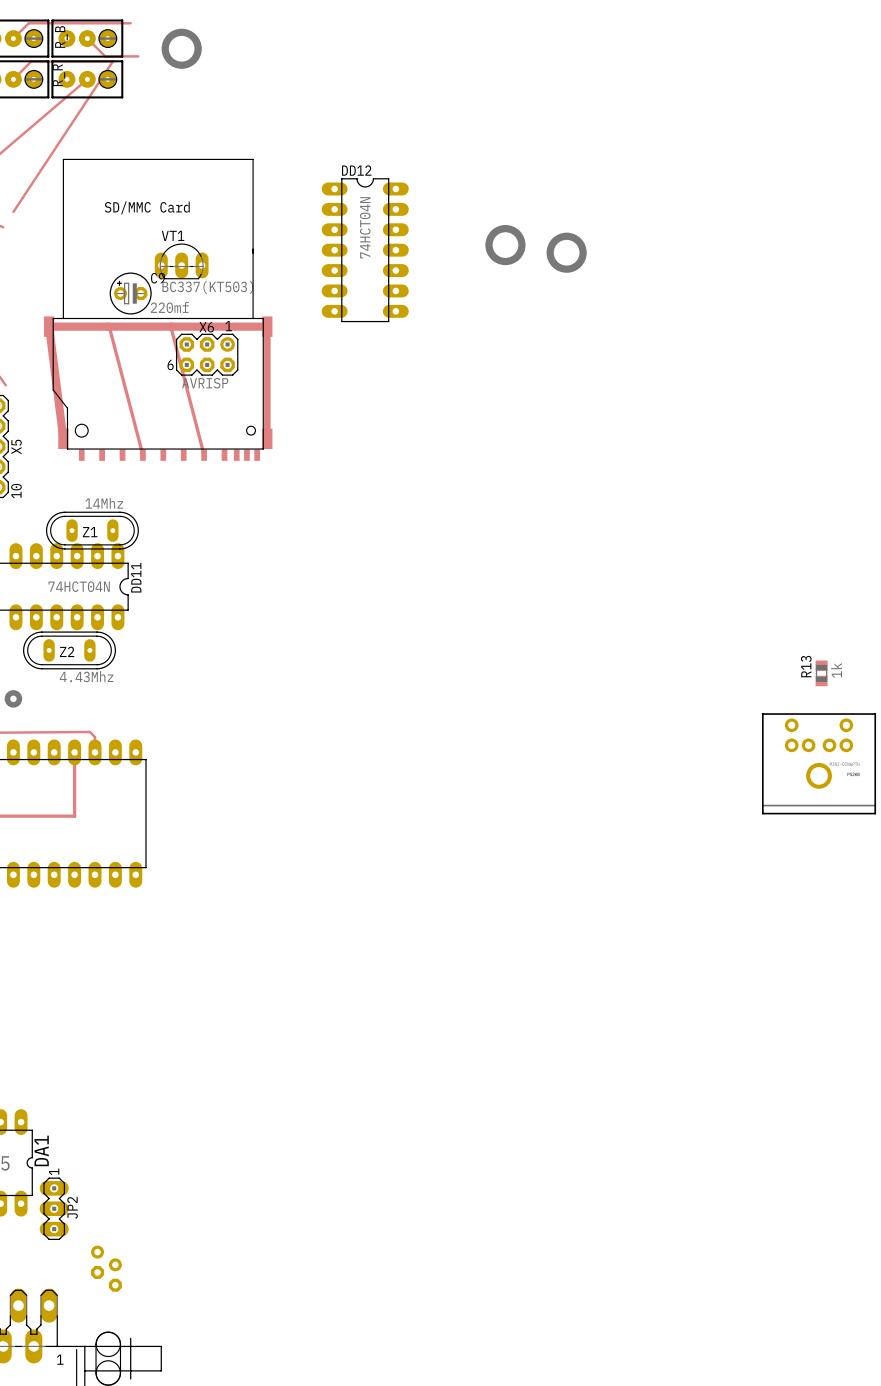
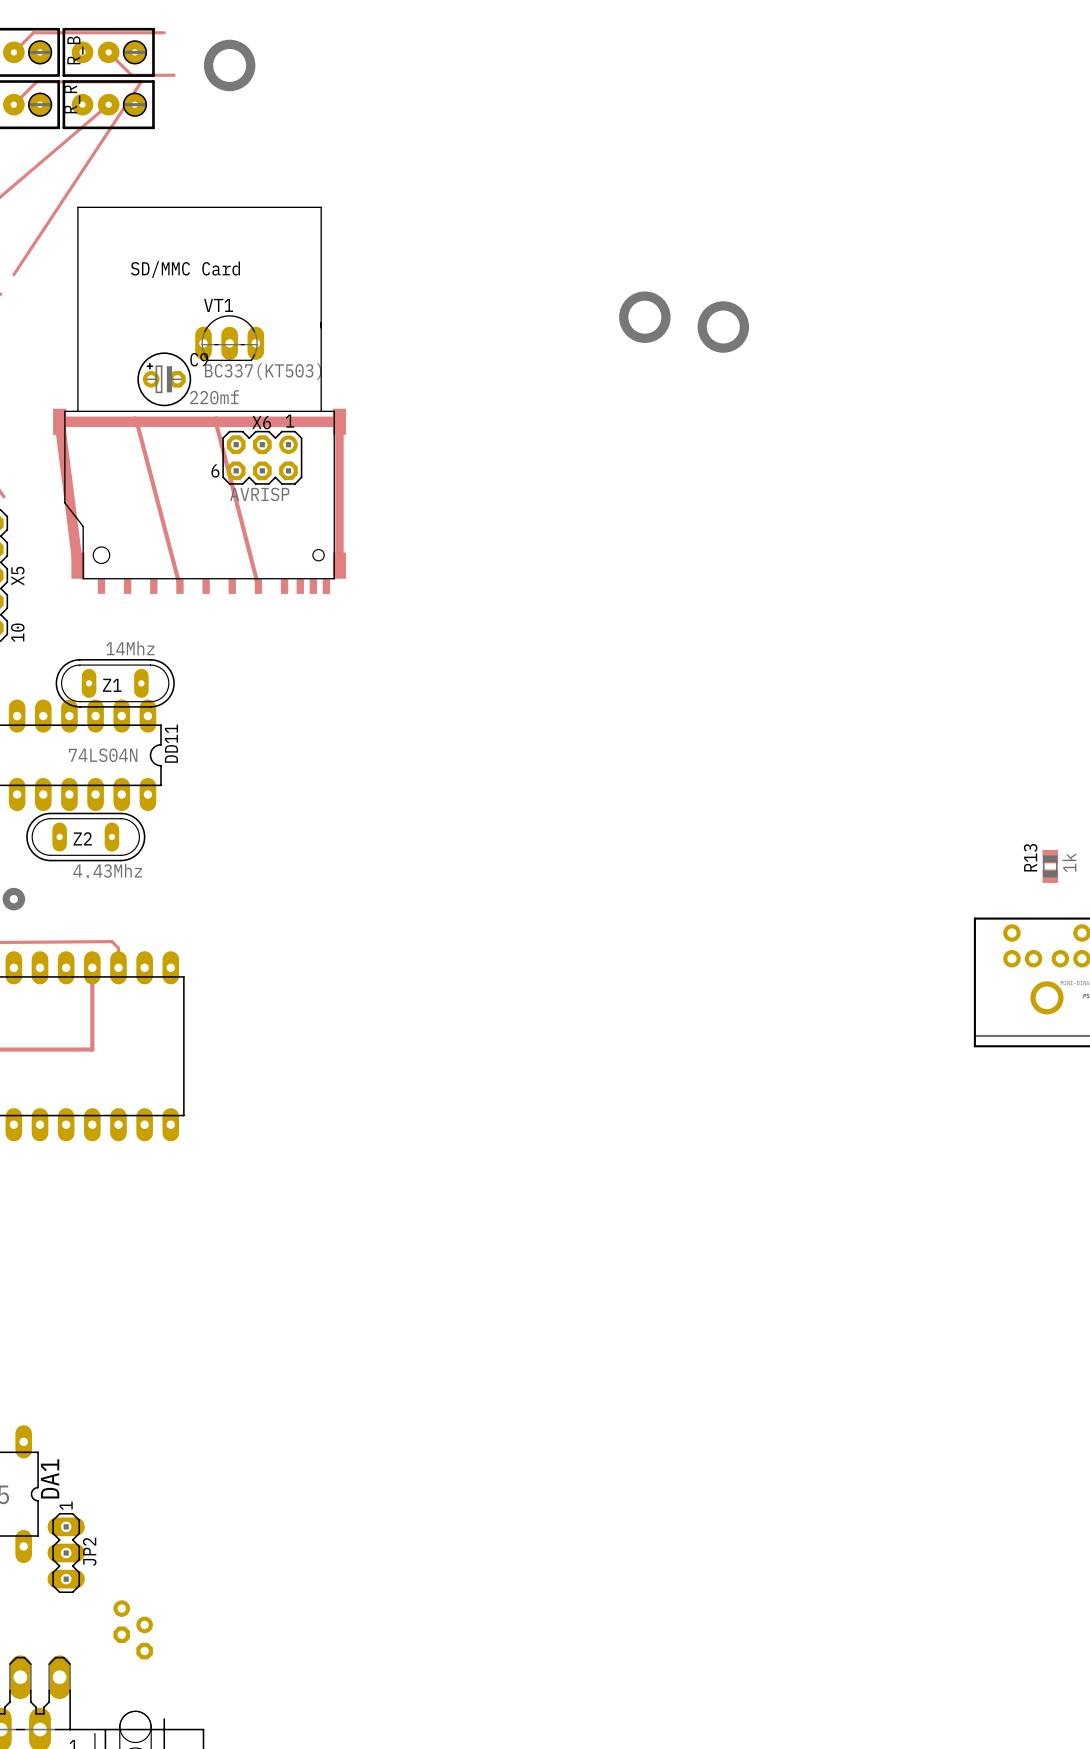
DD12: 74HCT04N (365, 250) -> none
DD11 value: 74HCT04N (79, 586) -> 74LS04N (103, 755)

